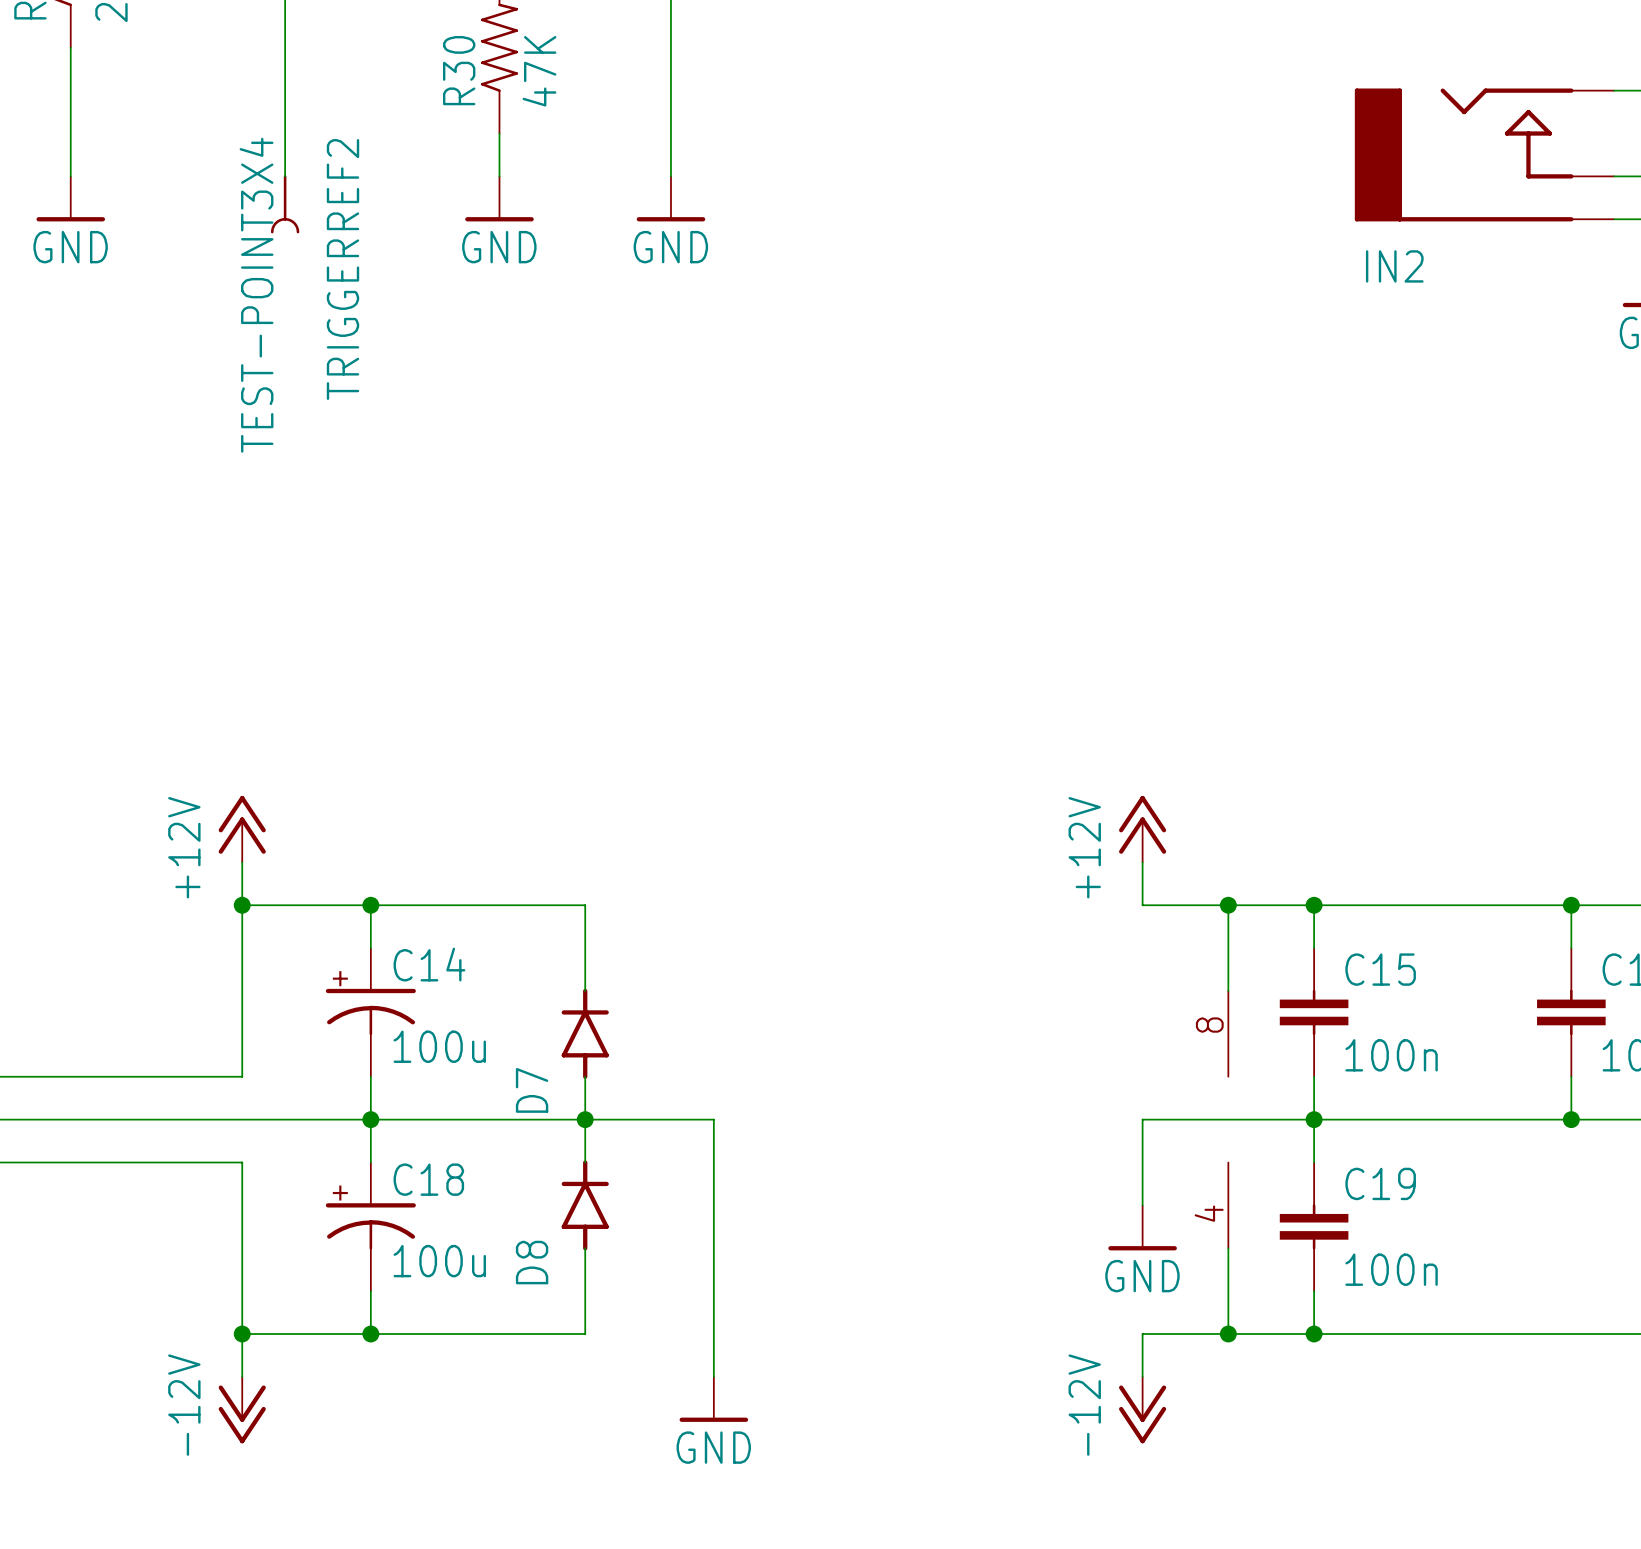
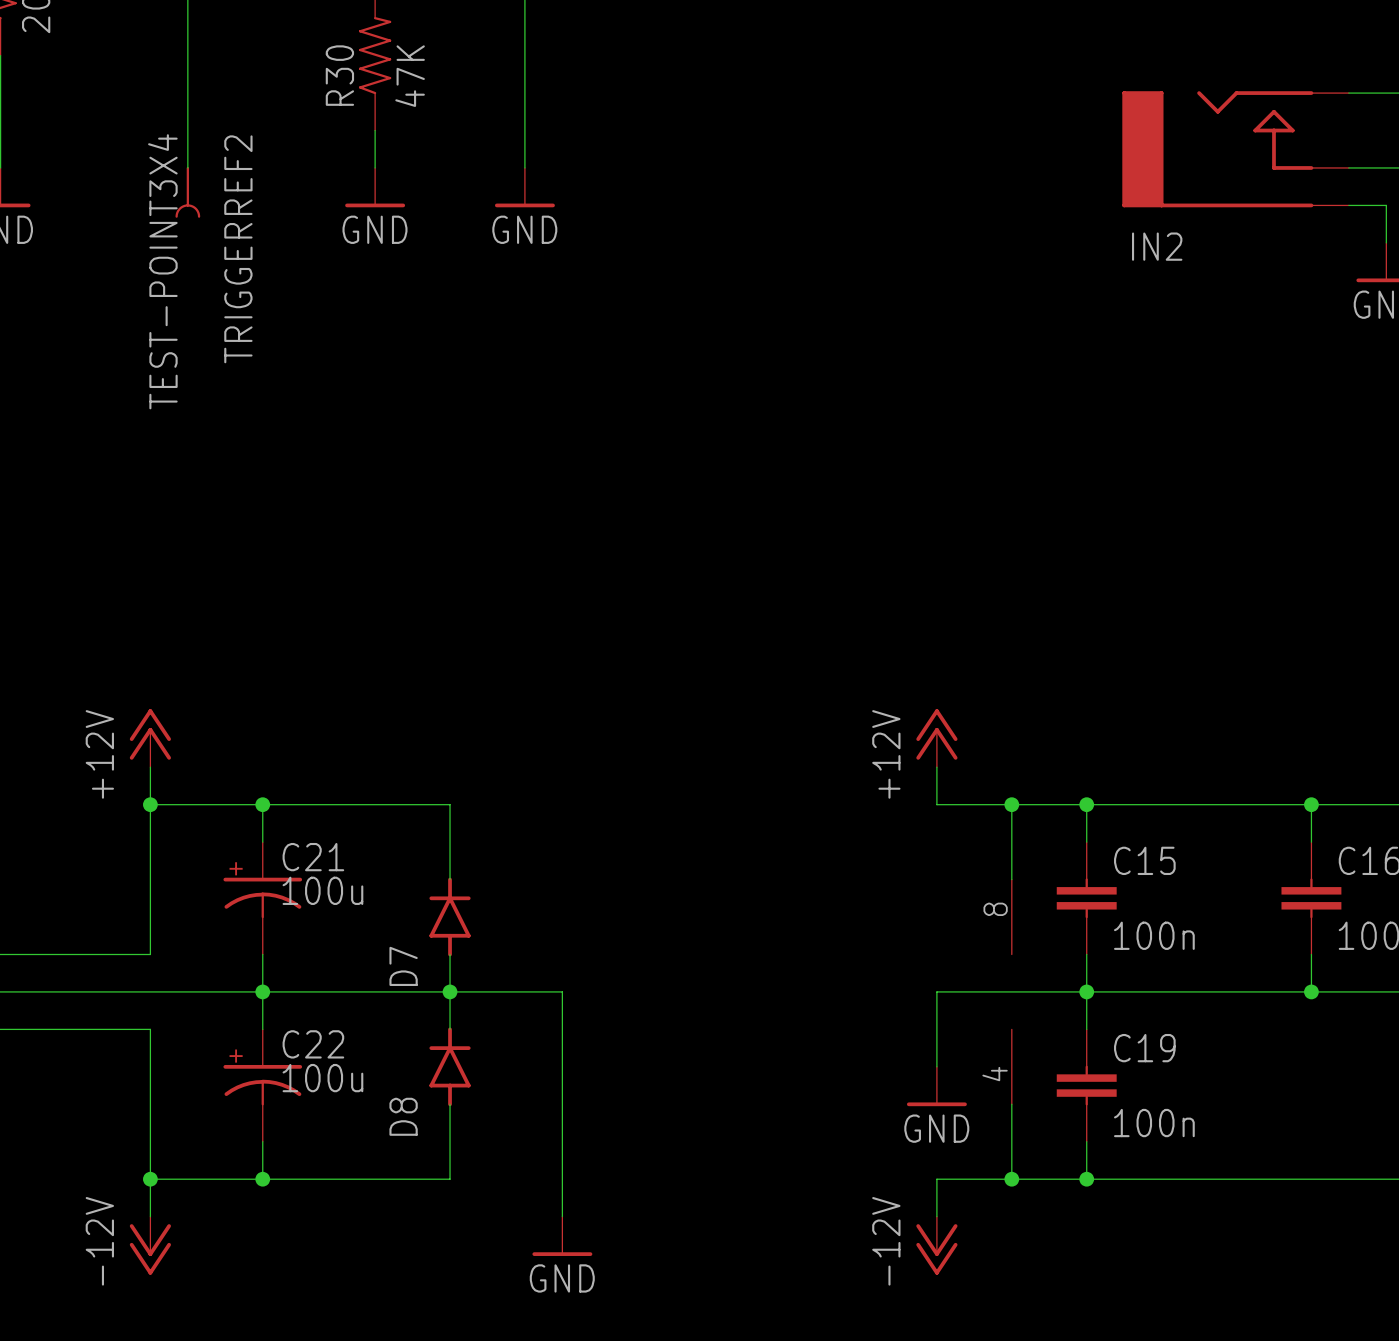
C14 name: C14 (429, 964) -> C21 (313, 857)
C14 value position: 100u (439, 1046) -> 100u (322, 890)
C18 name: C18 (428, 1179) -> C22 (313, 1044)
C18 value position: 100u (439, 1261) -> 100u (322, 1078)

